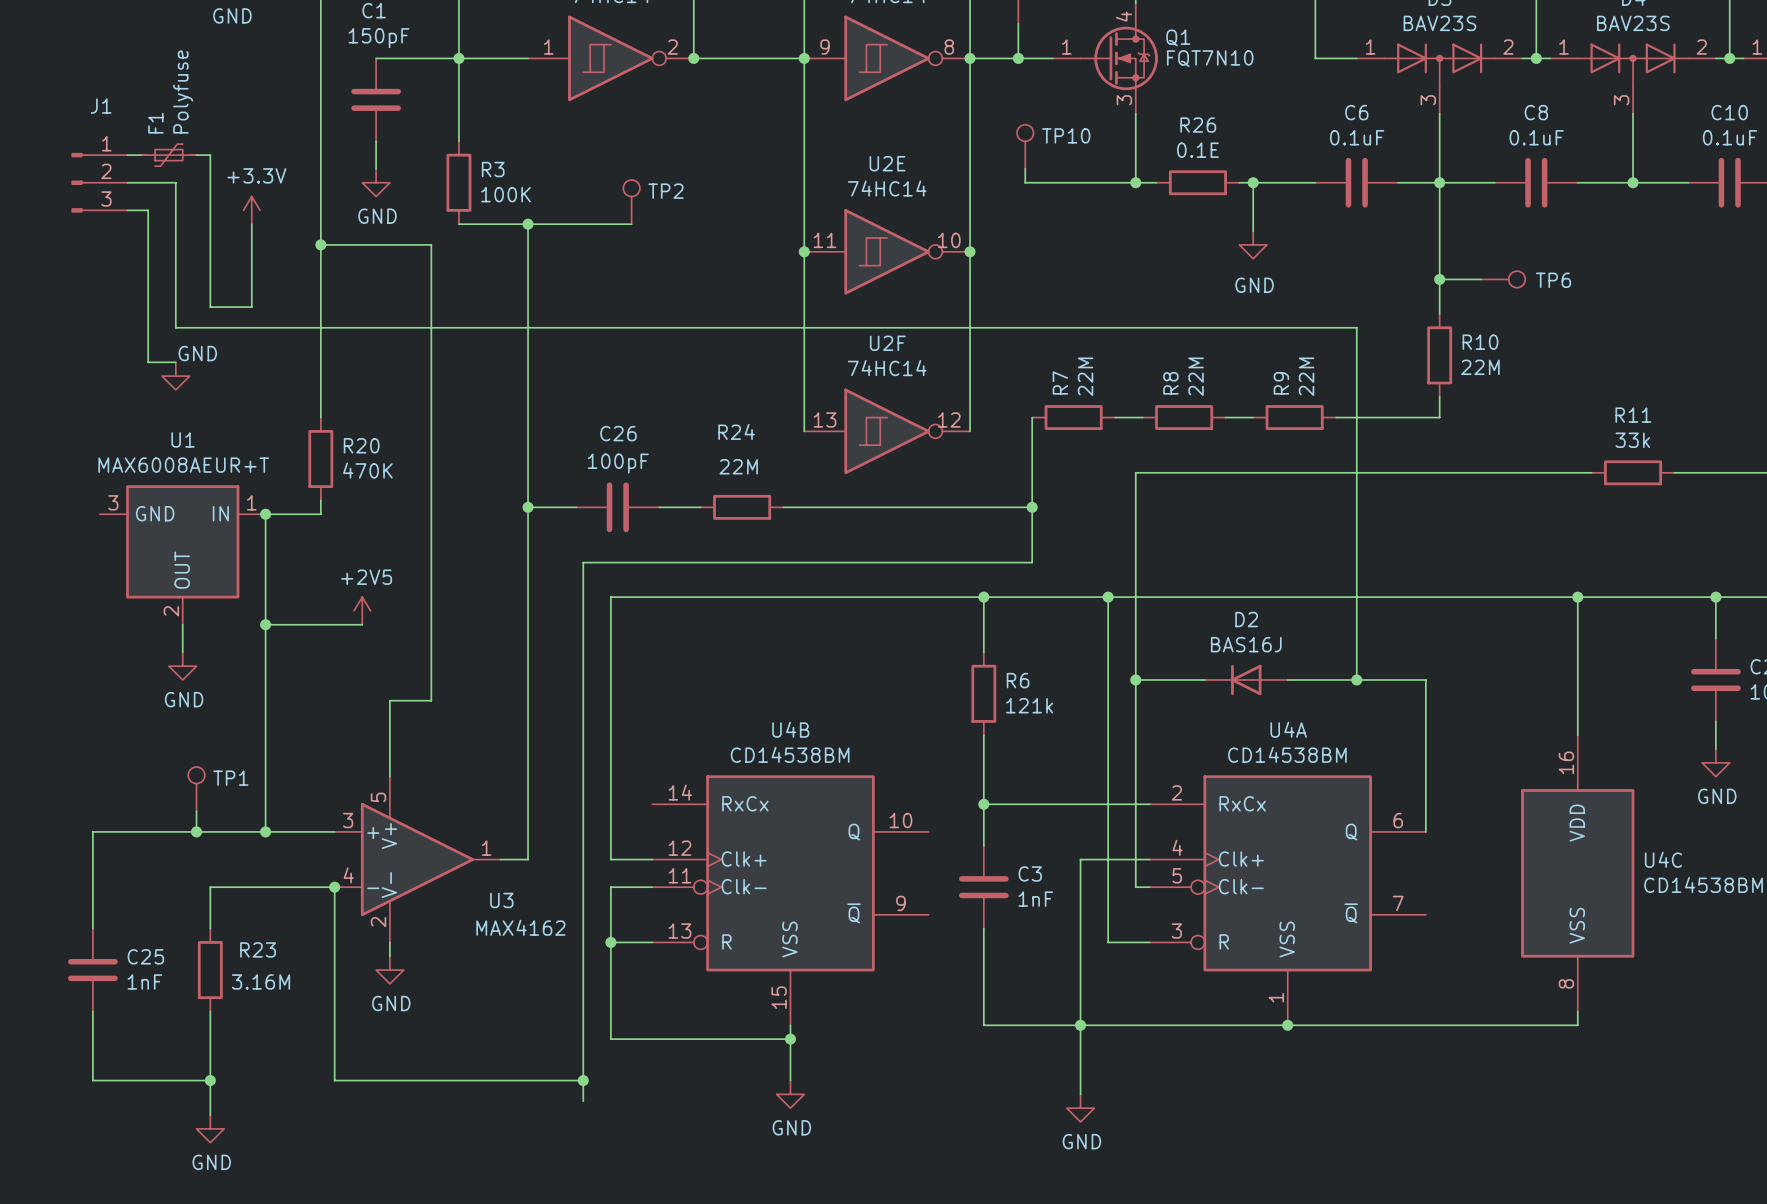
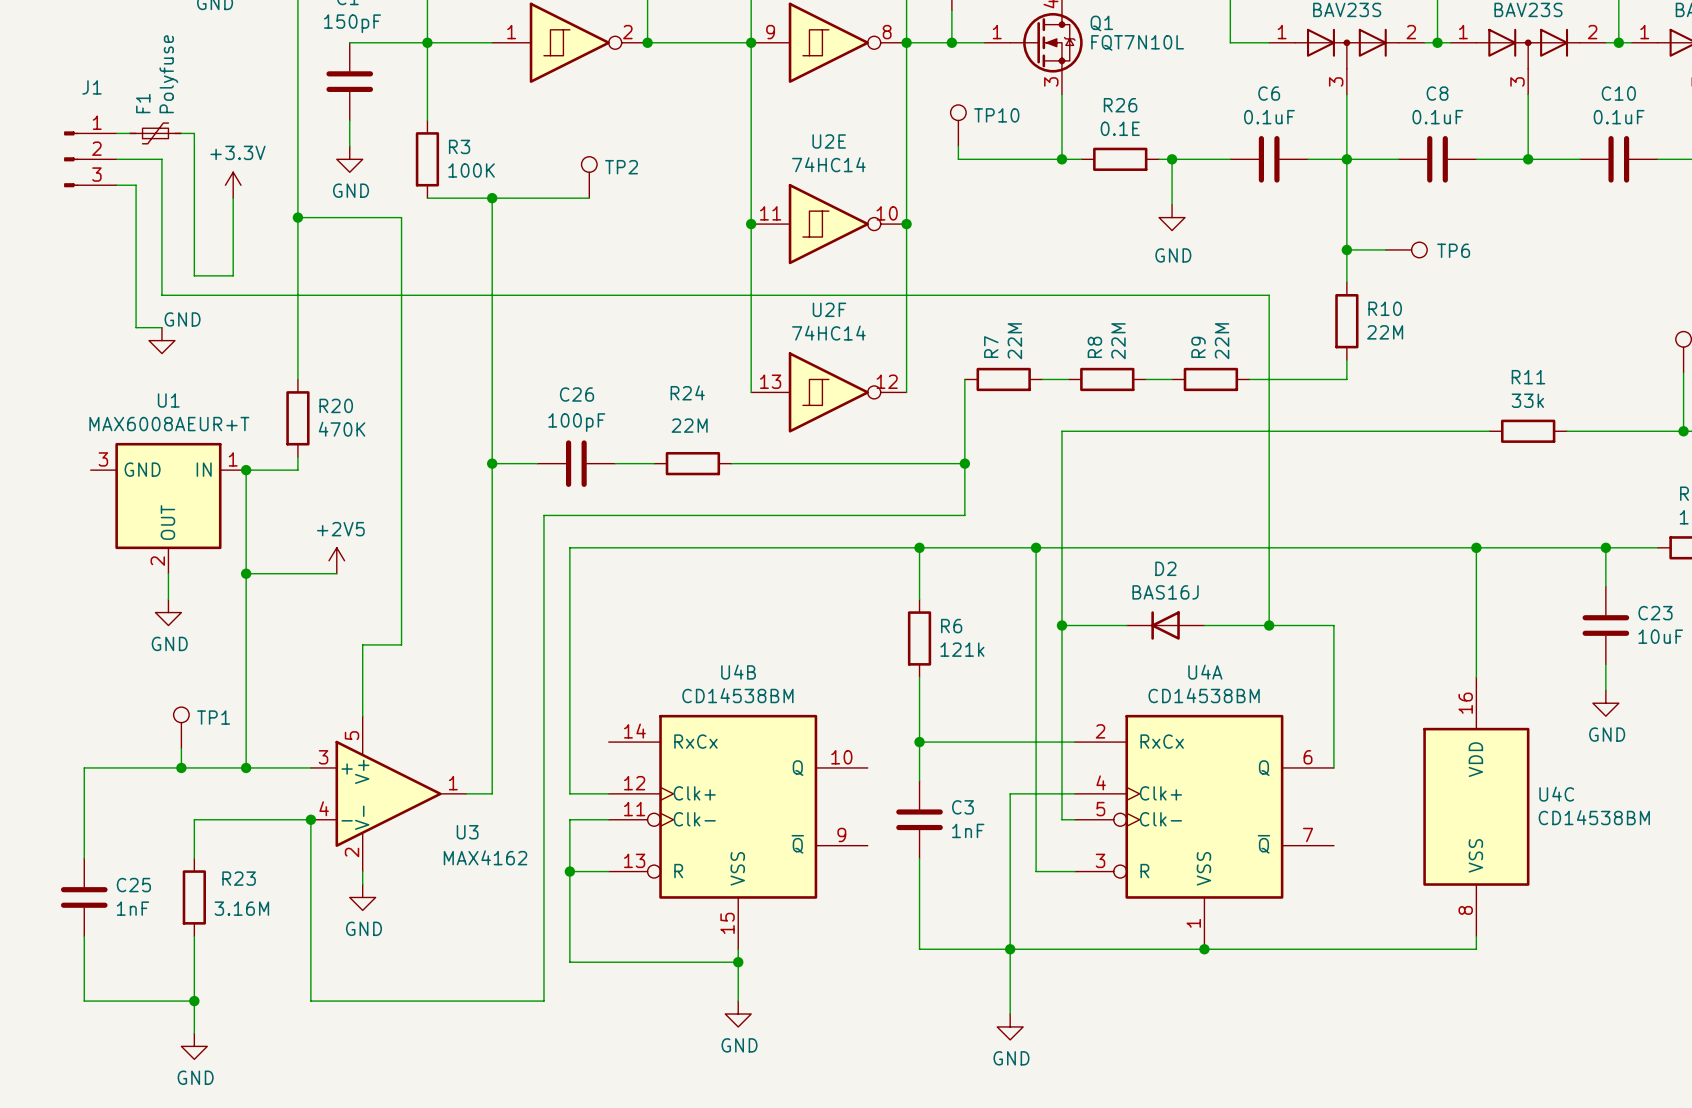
Q1 value: FQT7N10 (1210, 58) -> FQT7N10L (1137, 42)
wire: (583, 1080) (583, 1101) -> none
junction: (583, 1080) -> none

